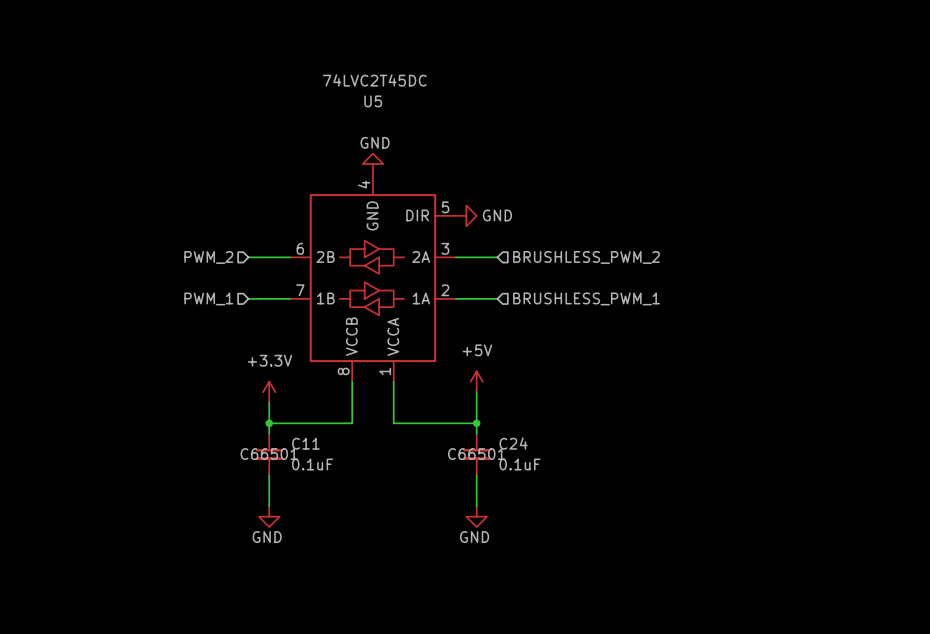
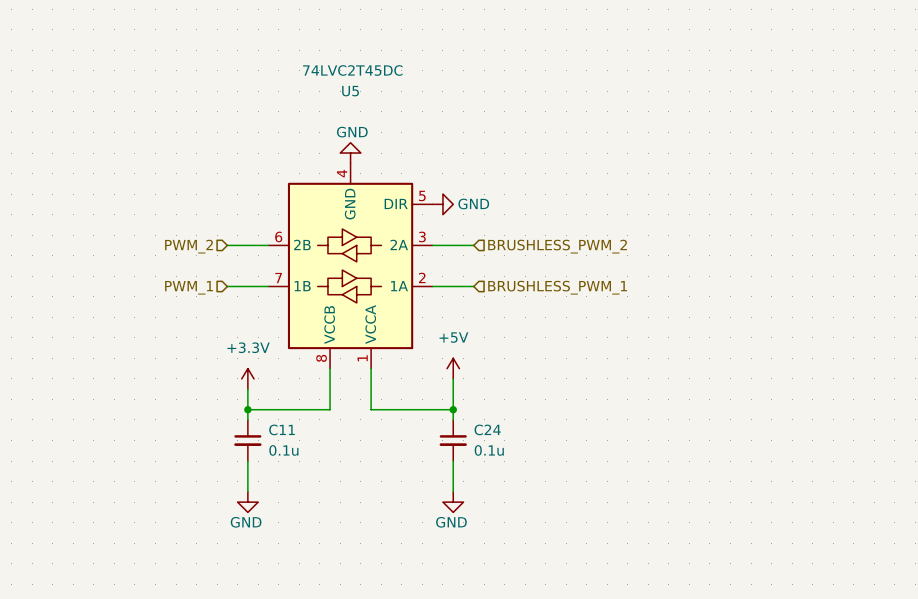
C11 text: C66501 (269, 454) -> none
C24 text: C66501 (476, 454) -> none
C11 value: 0.1uF (312, 464) -> 0.1u (283, 450)
C24 value: 0.1uF (519, 464) -> 0.1u (489, 450)

